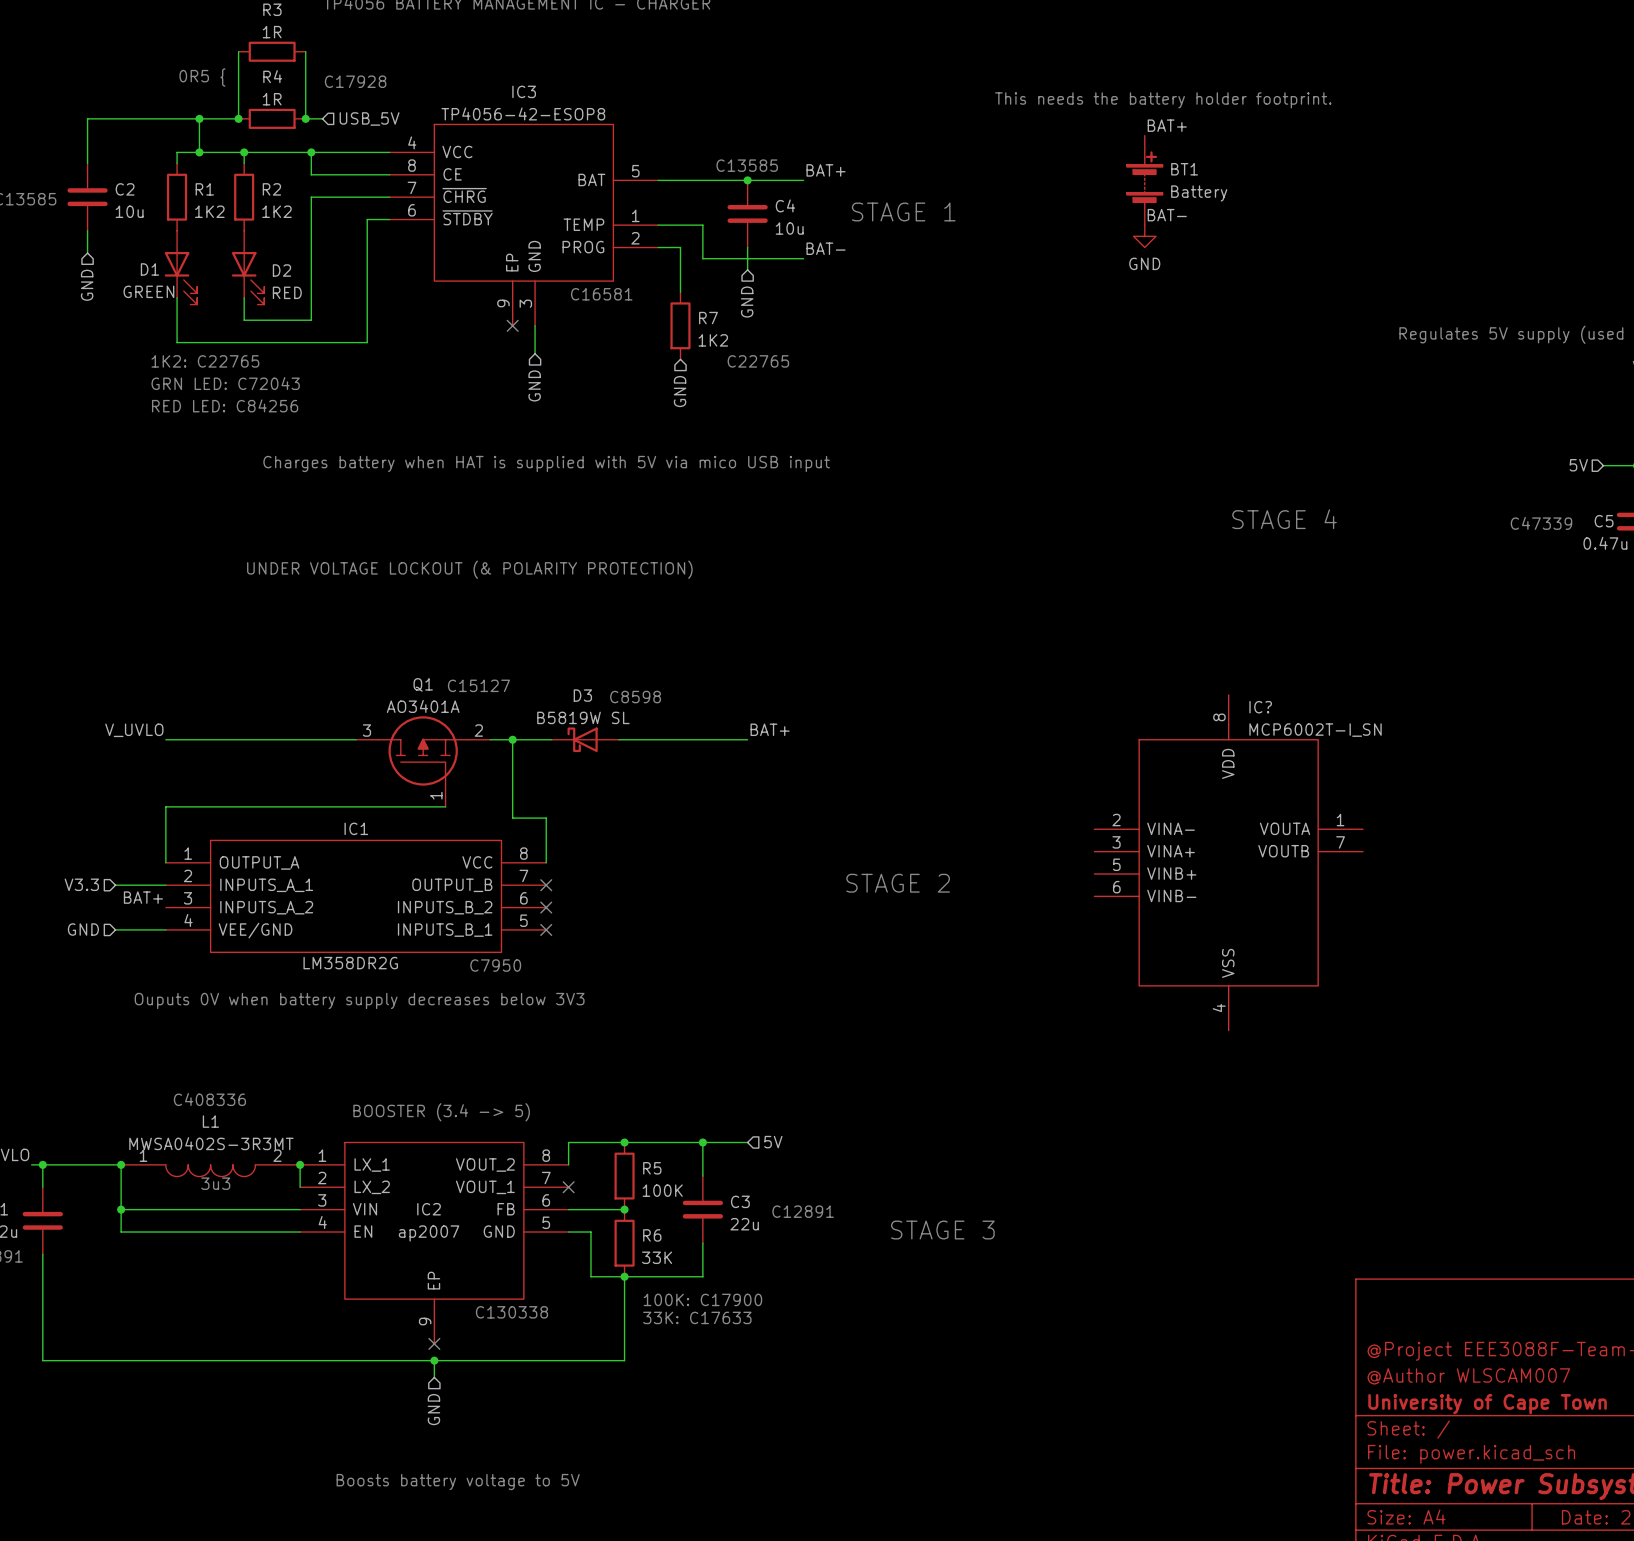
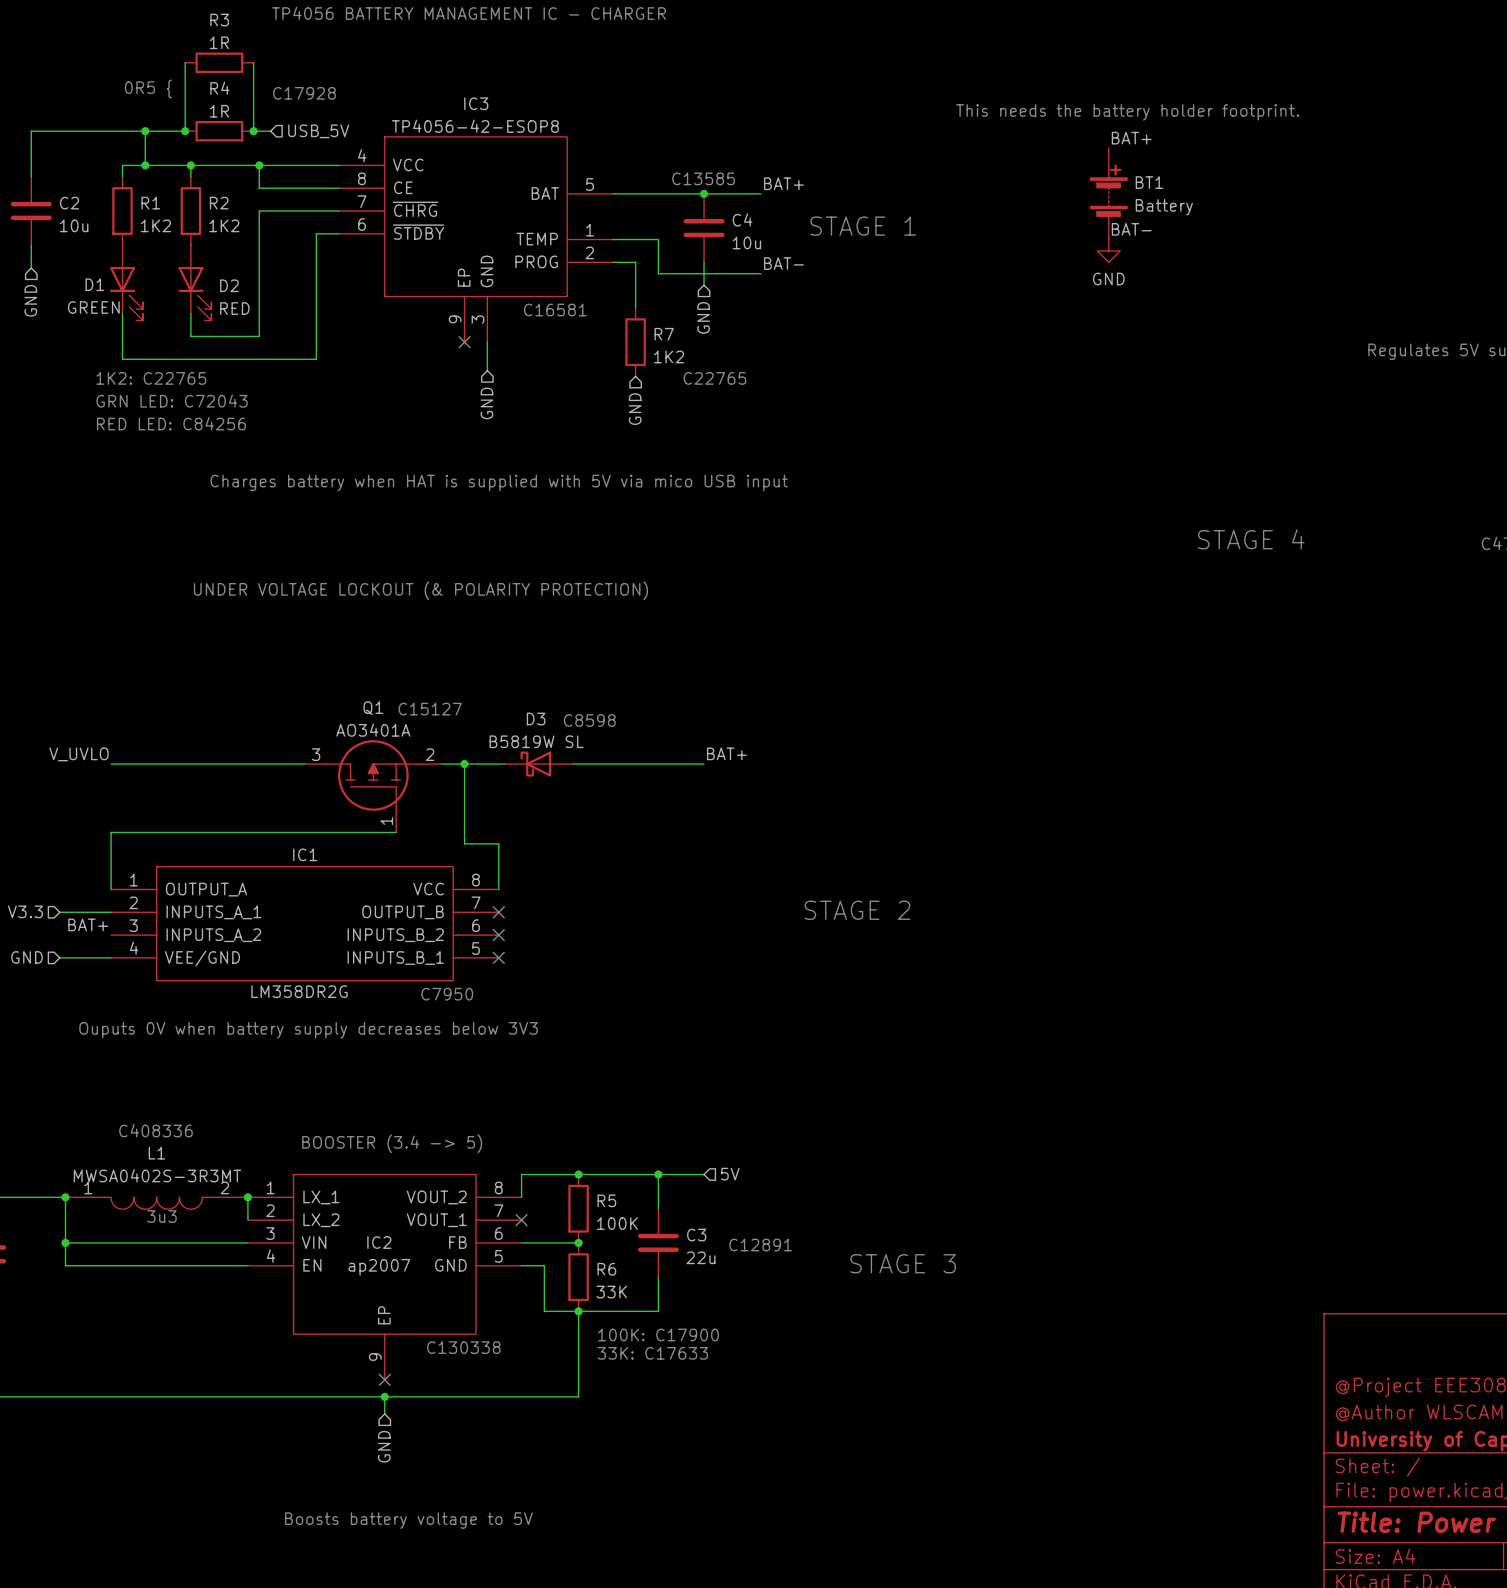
IC?: MCP6002T-I_SN (1228, 862) -> none

